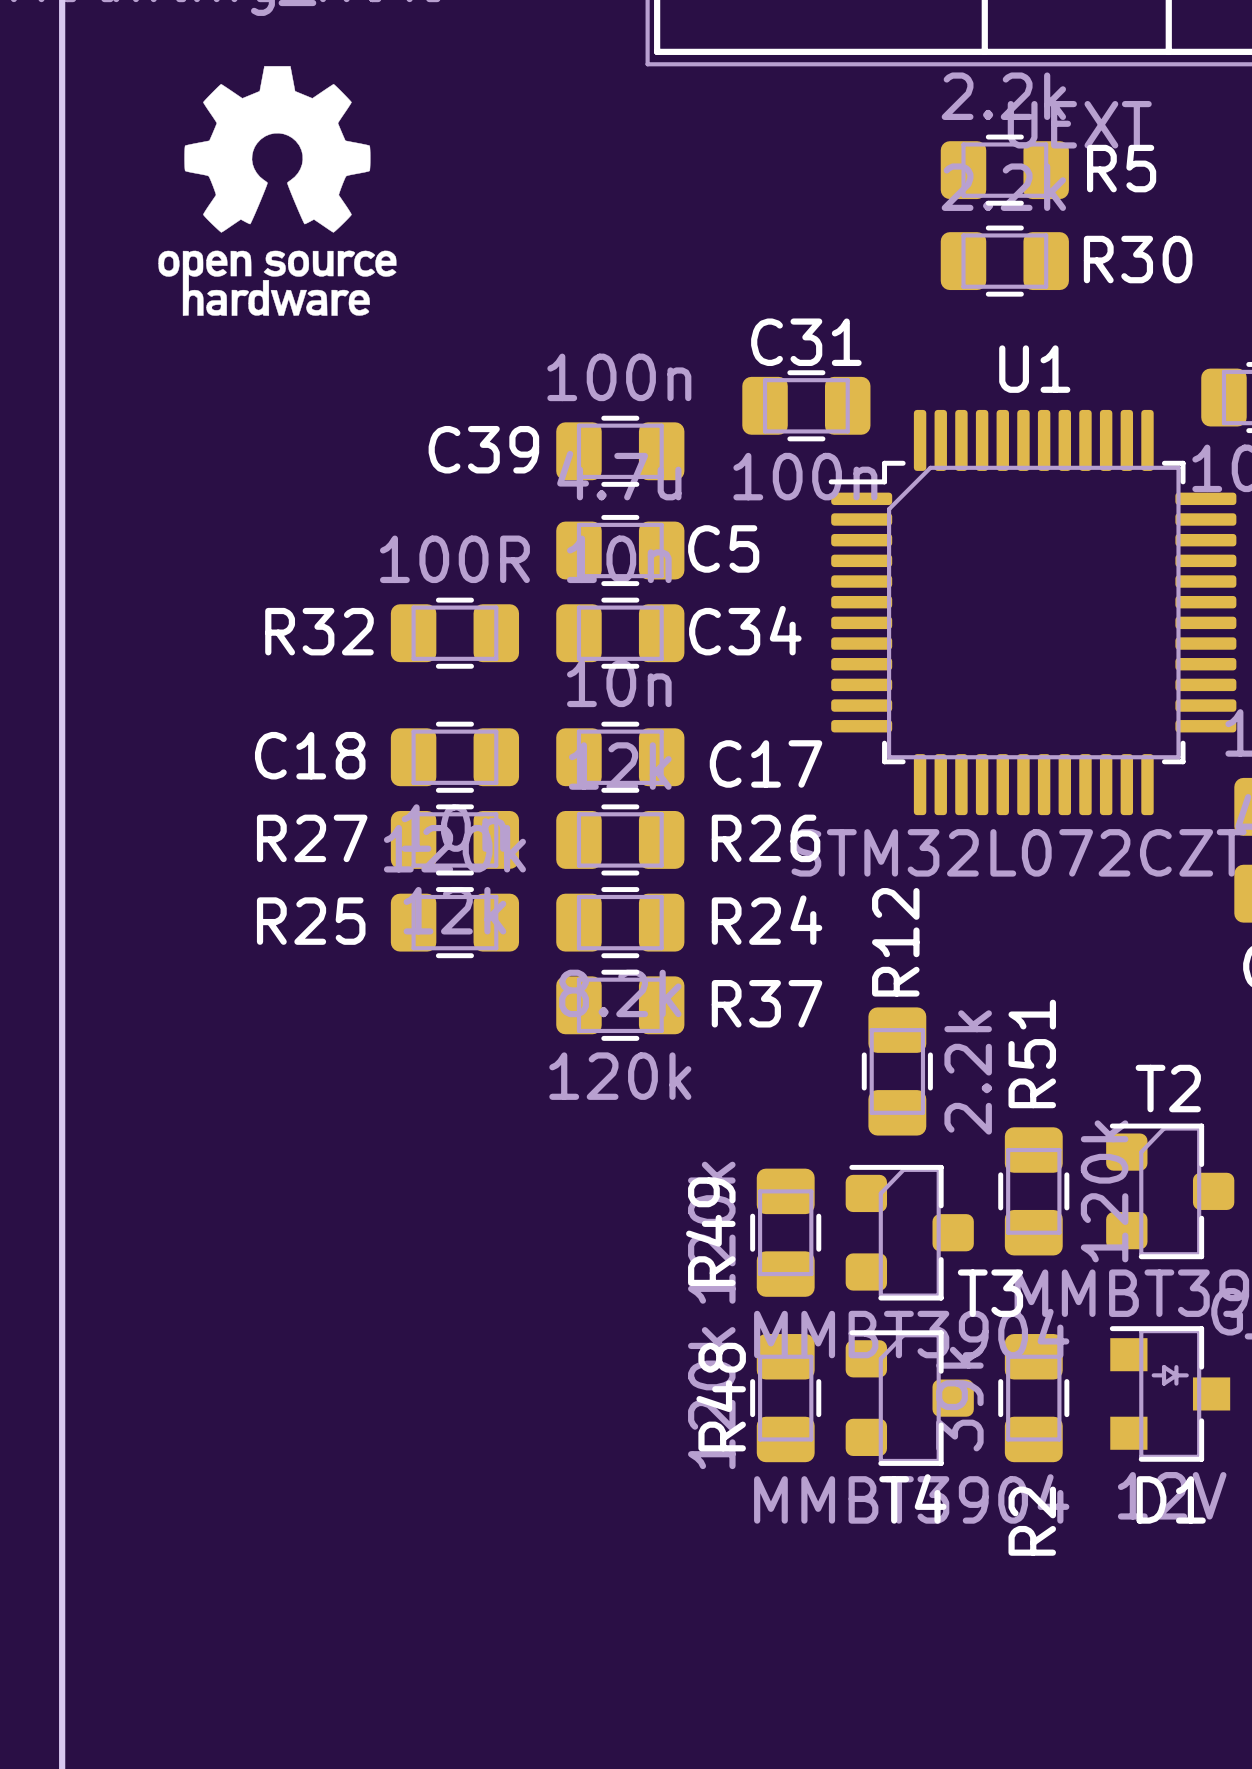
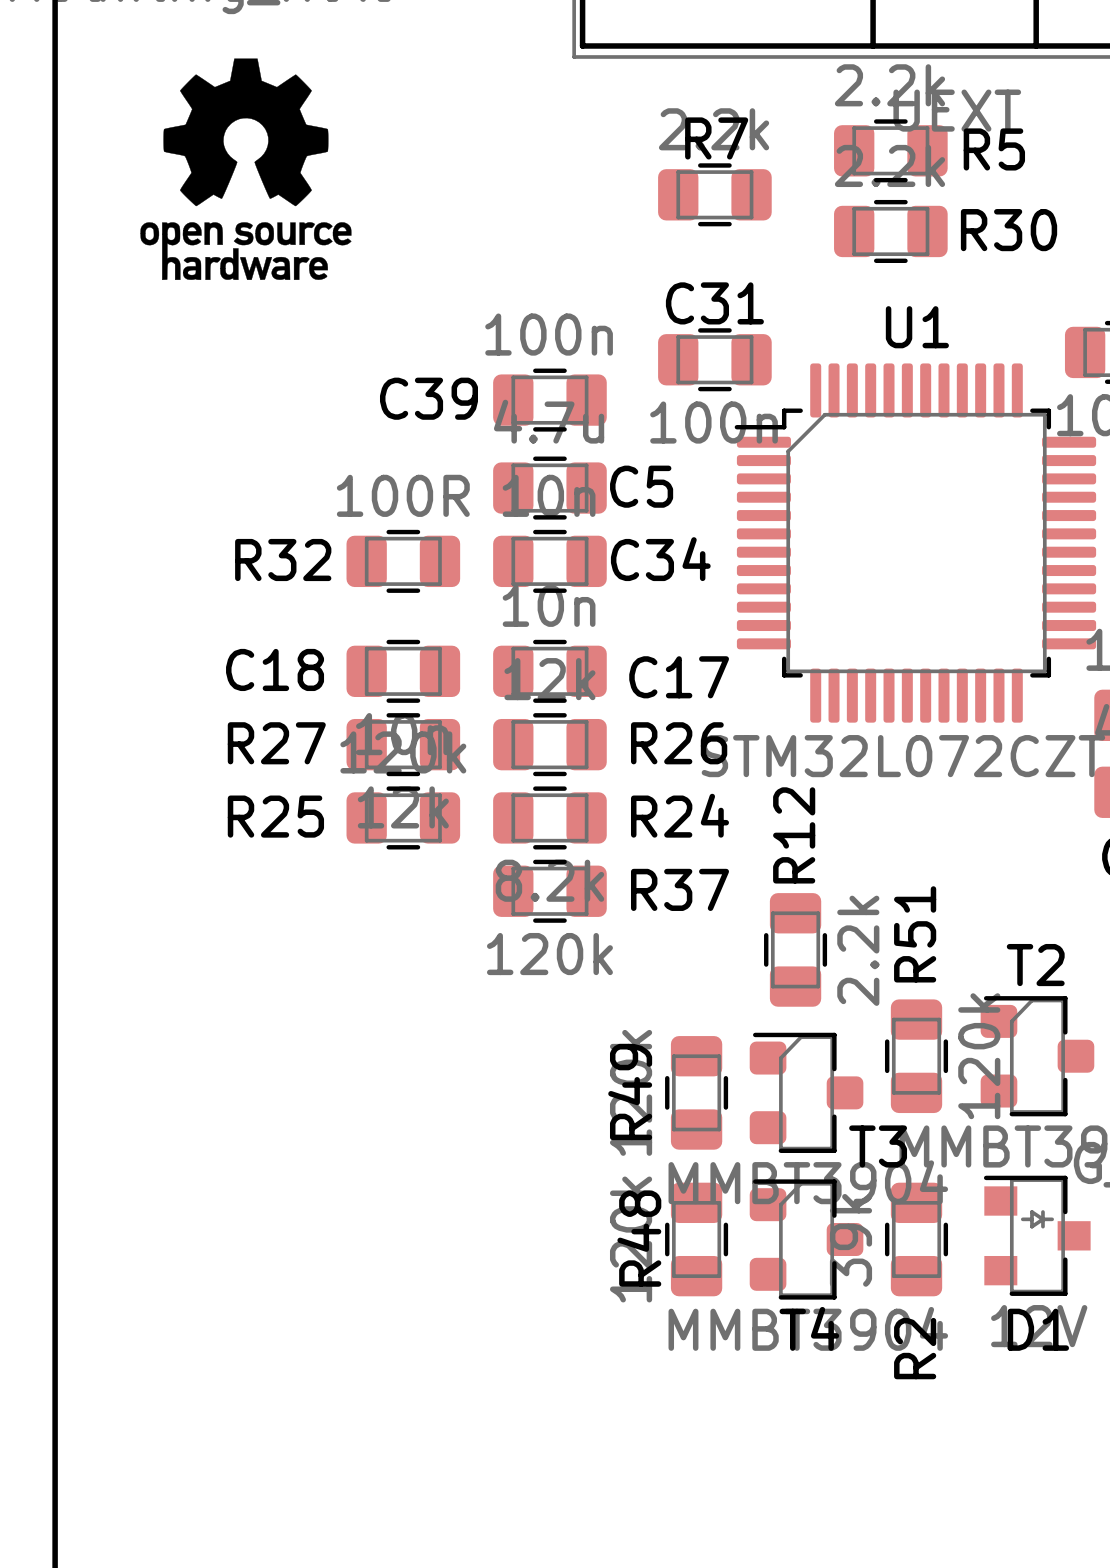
R7: none -> 2.2k (714, 194)

